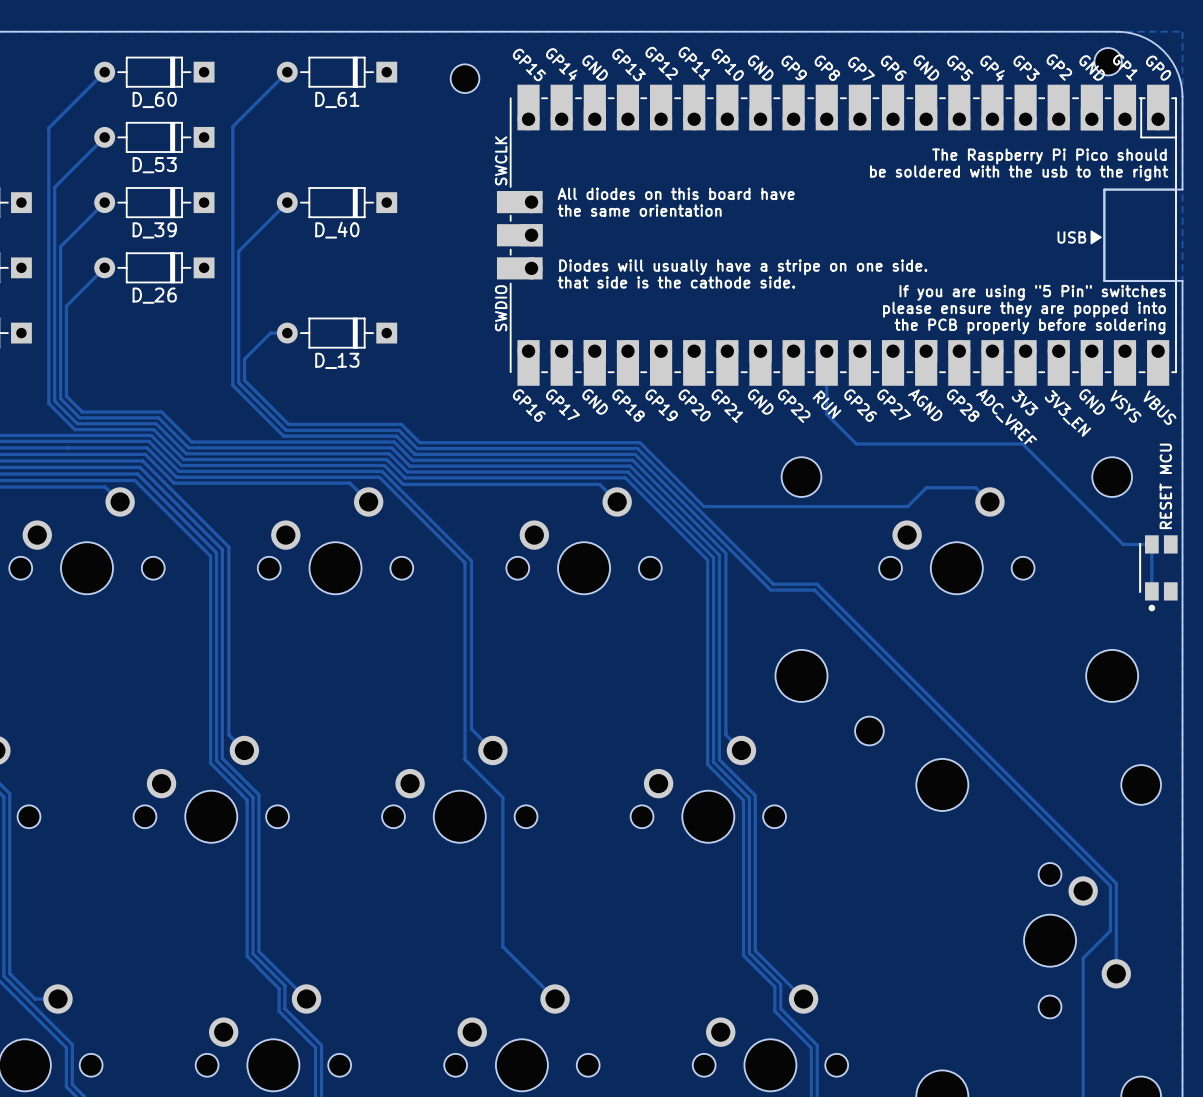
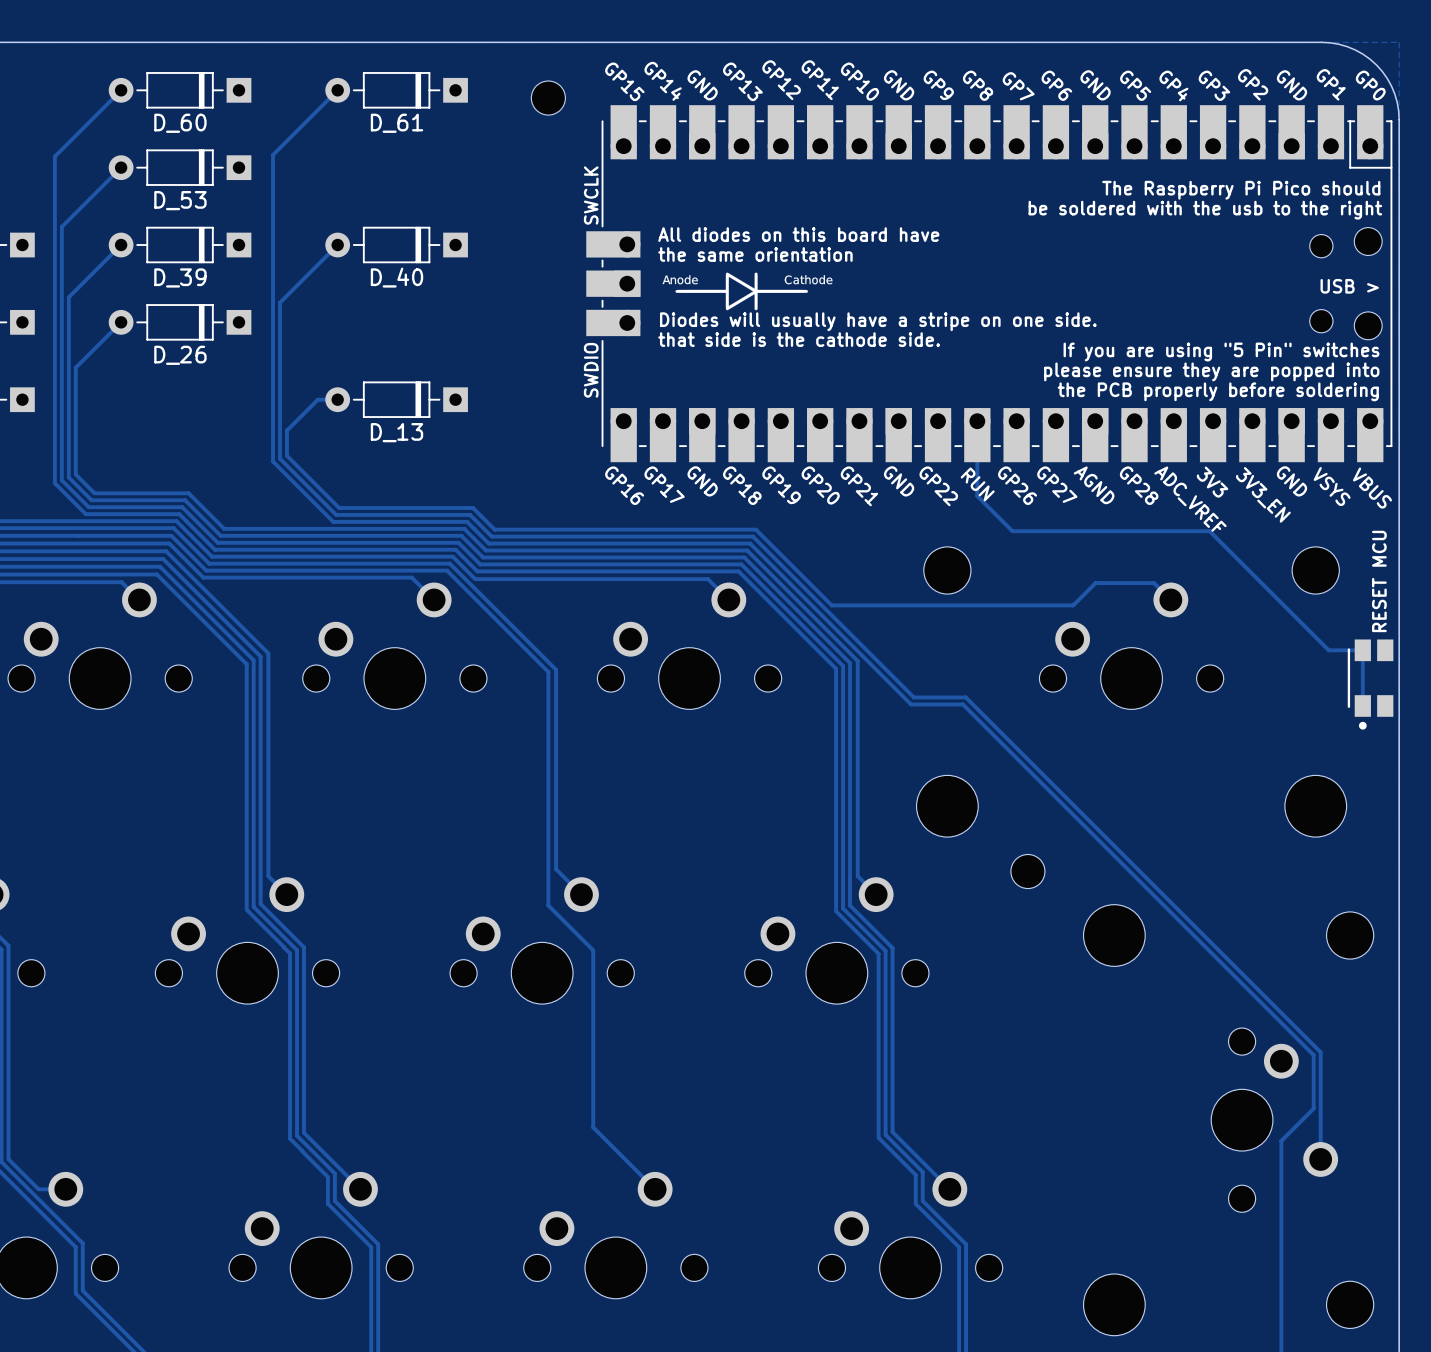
part: (1108, 61) -> none
part footprint: [496, 84, 1177, 386] -> [586, 105, 1393, 463]
board edge: (1182, 189) (1104, 189) (1104, 280) (1182, 280) -> (1399, 229) (1399, 337)
drawing: none -> [662, 272, 833, 311]
drawing: [1090, 230, 1102, 245] -> none
text: USB (1071, 237) -> none
text: none -> USB > (1349, 286)

